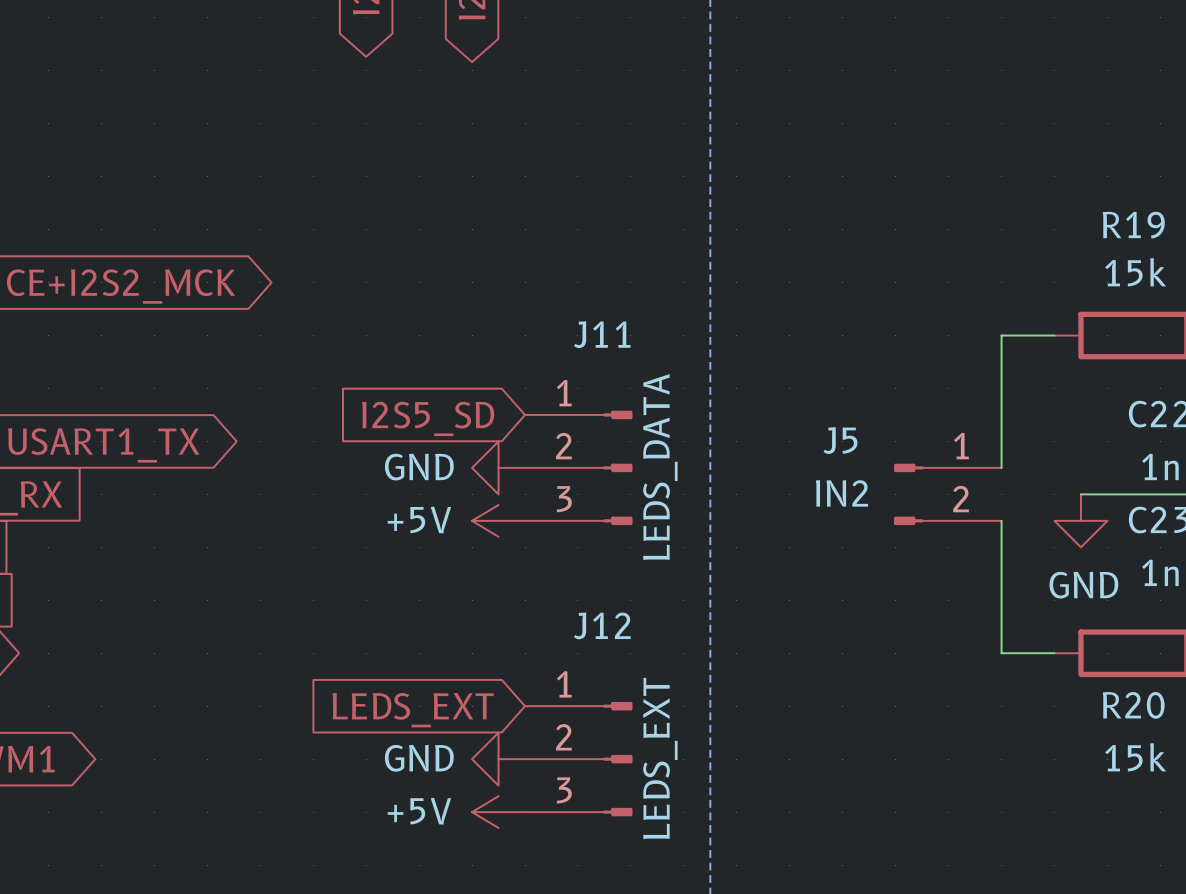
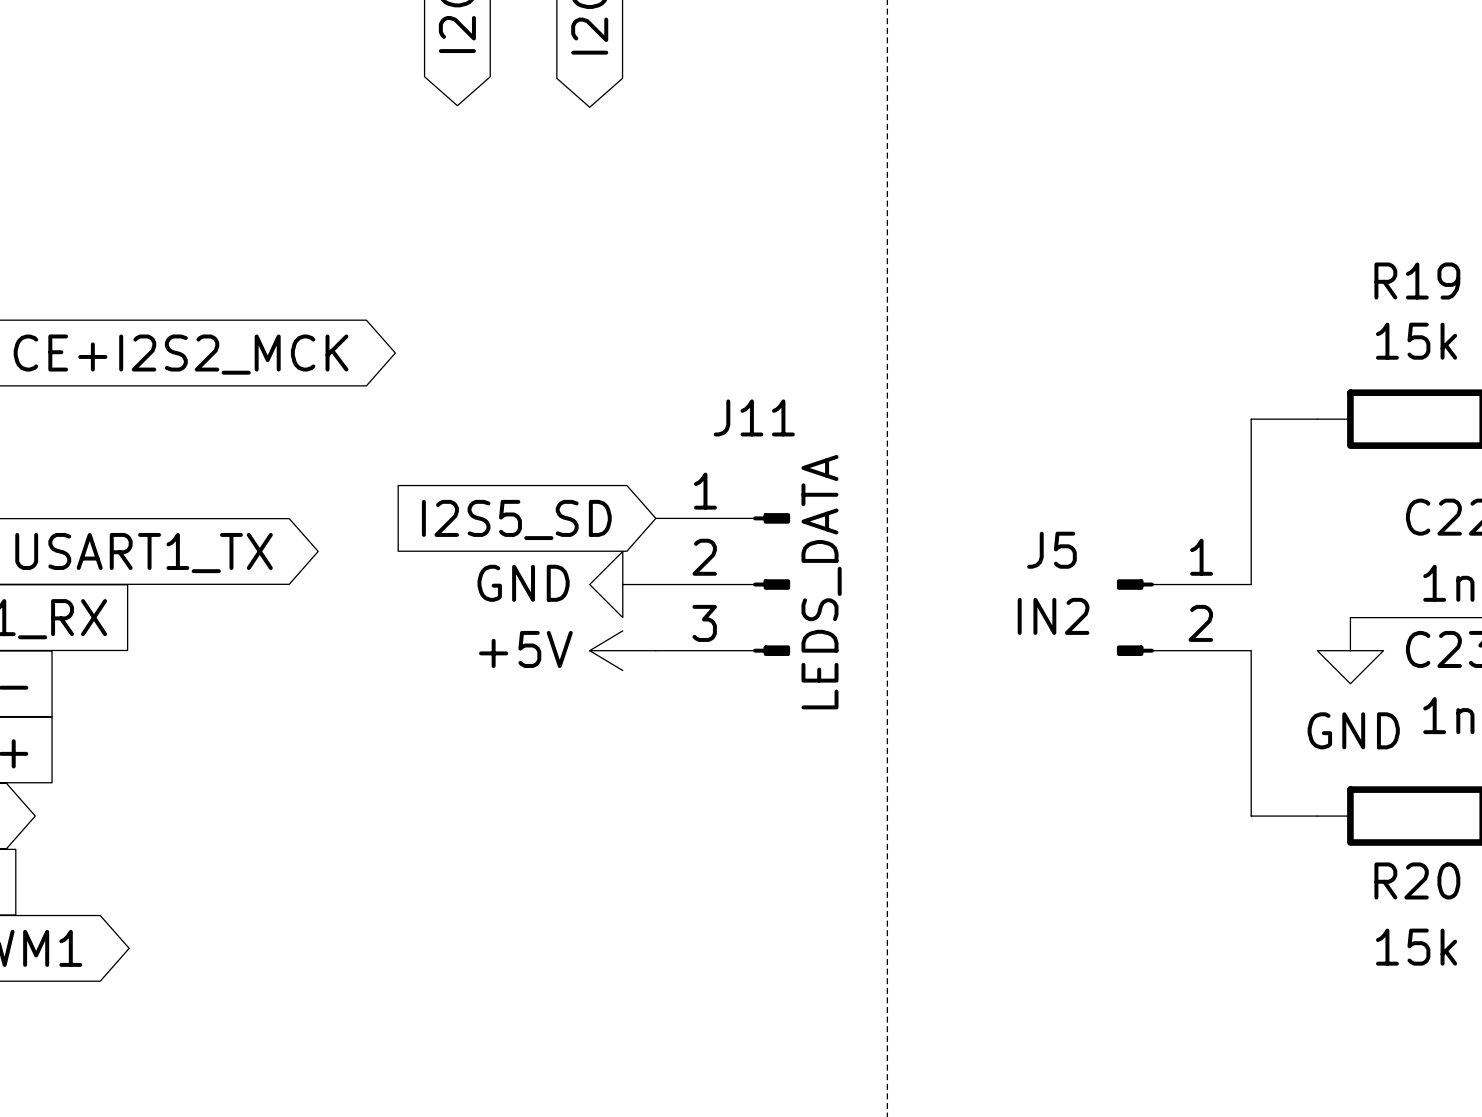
global label: LEDS_EXT (413, 710) -> none
power symbol: GND (498, 759) -> none
J12: LEDS_EXT (578, 759) -> none
power symbol: +5V (498, 812) -> none

